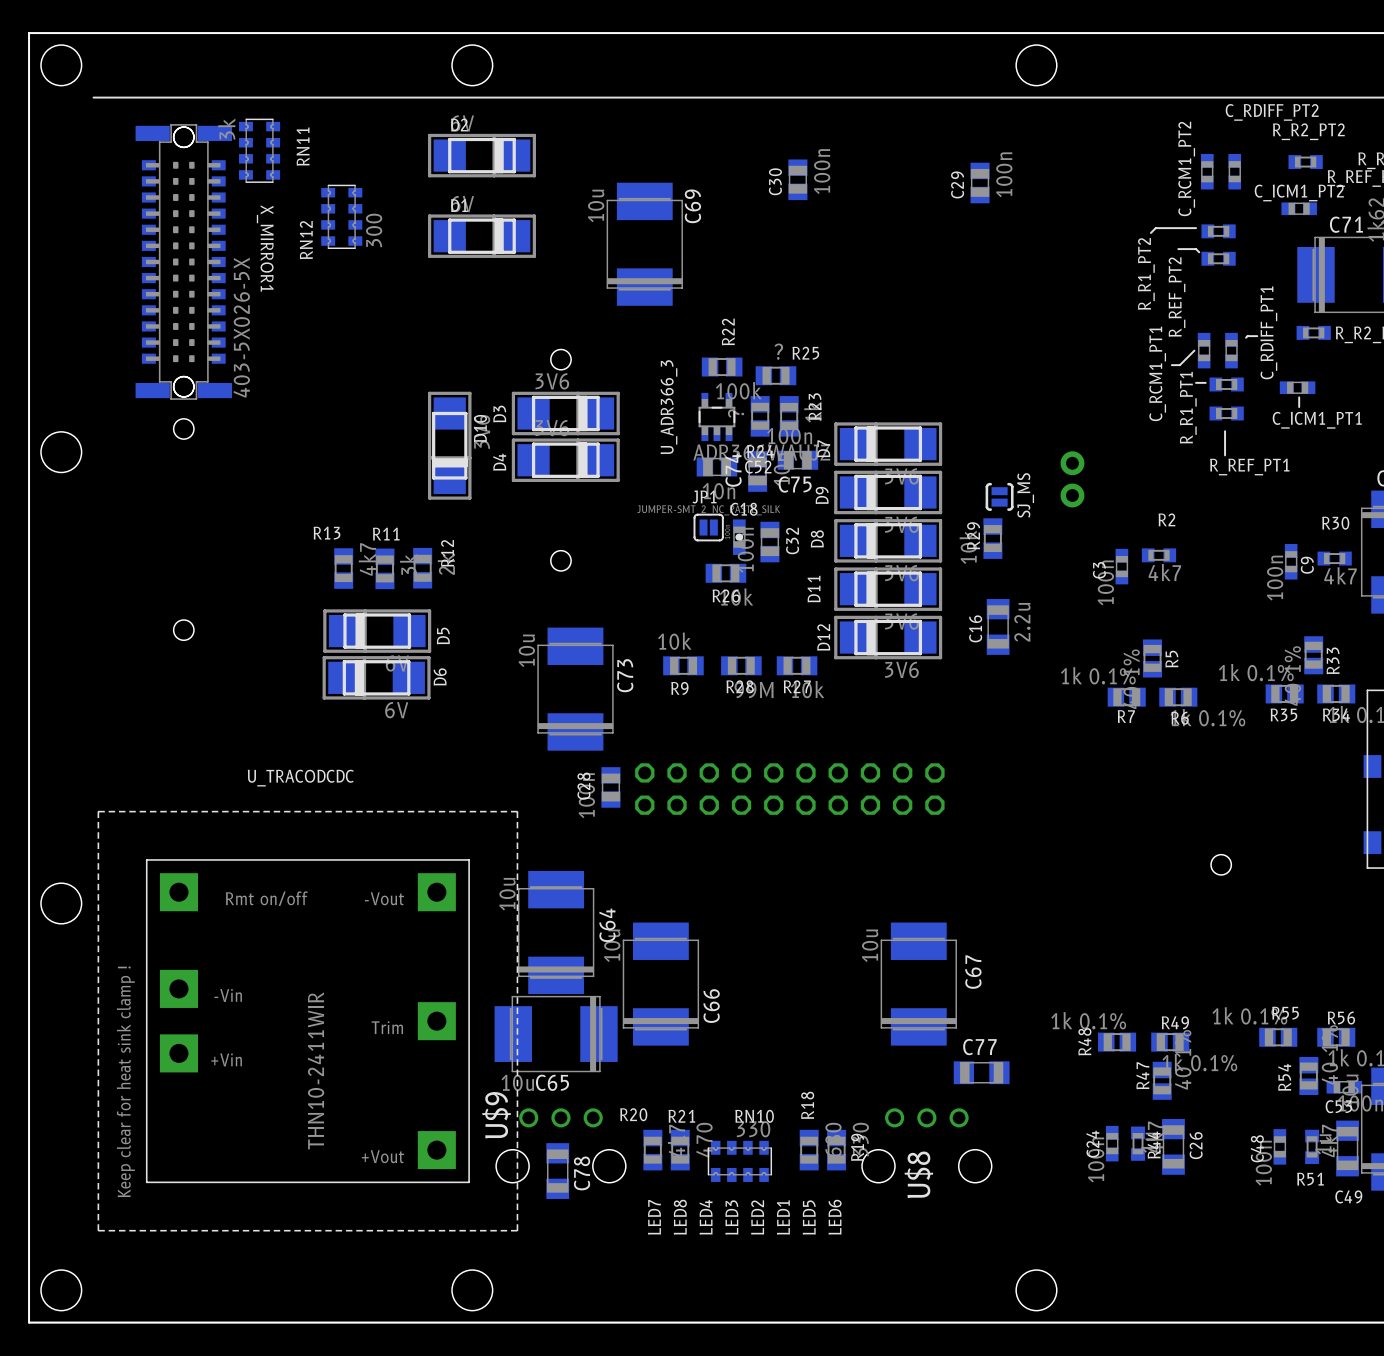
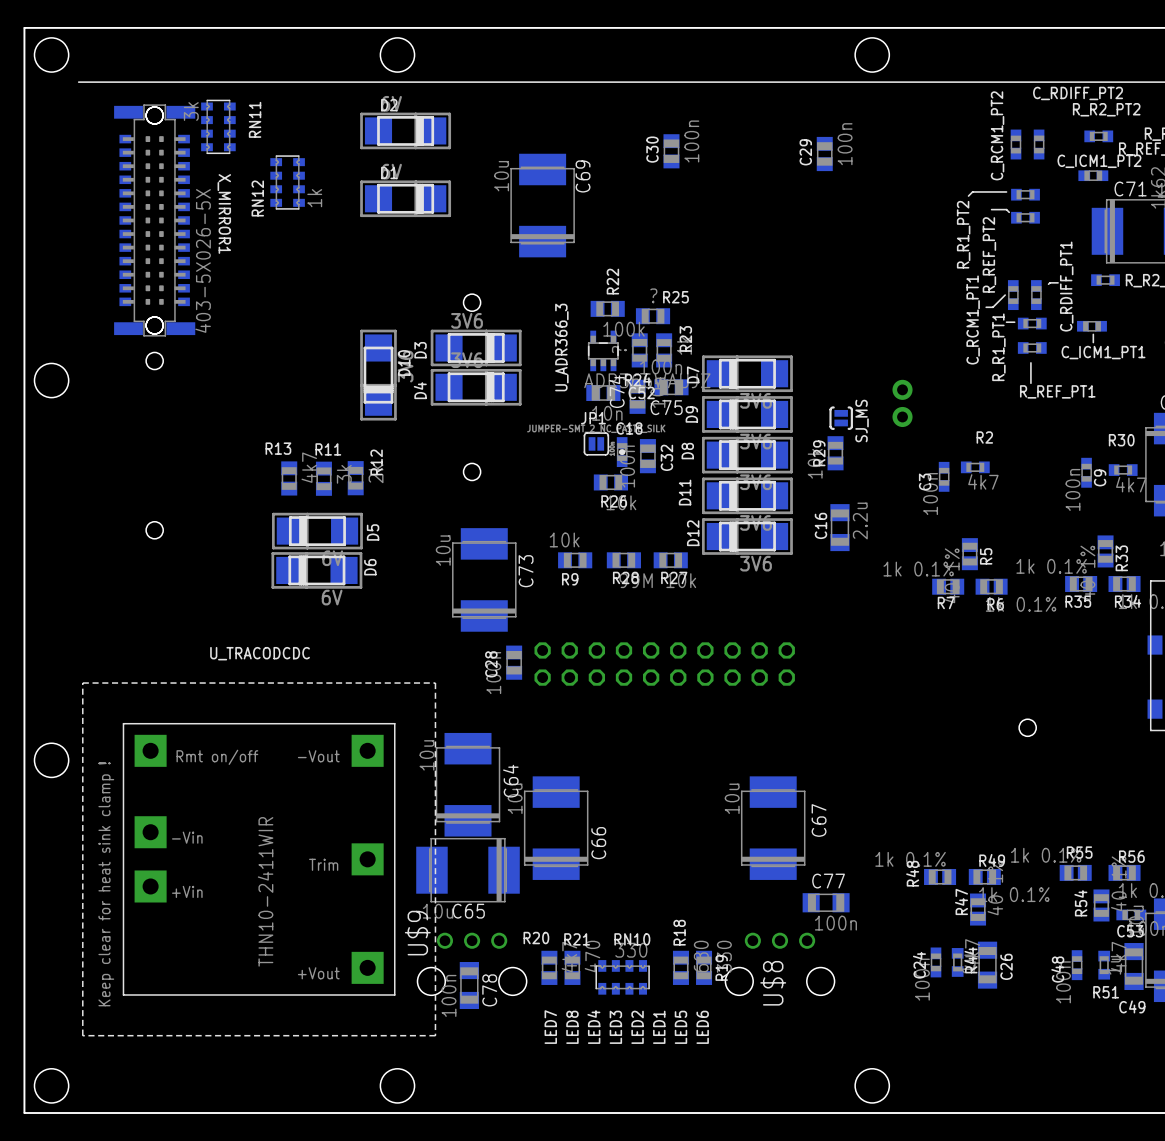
RN12 value: 300 (374, 230) -> 1k (314, 198)
C77 value: none -> 100n (835, 923)
C78 value: none -> 100n (449, 995)

